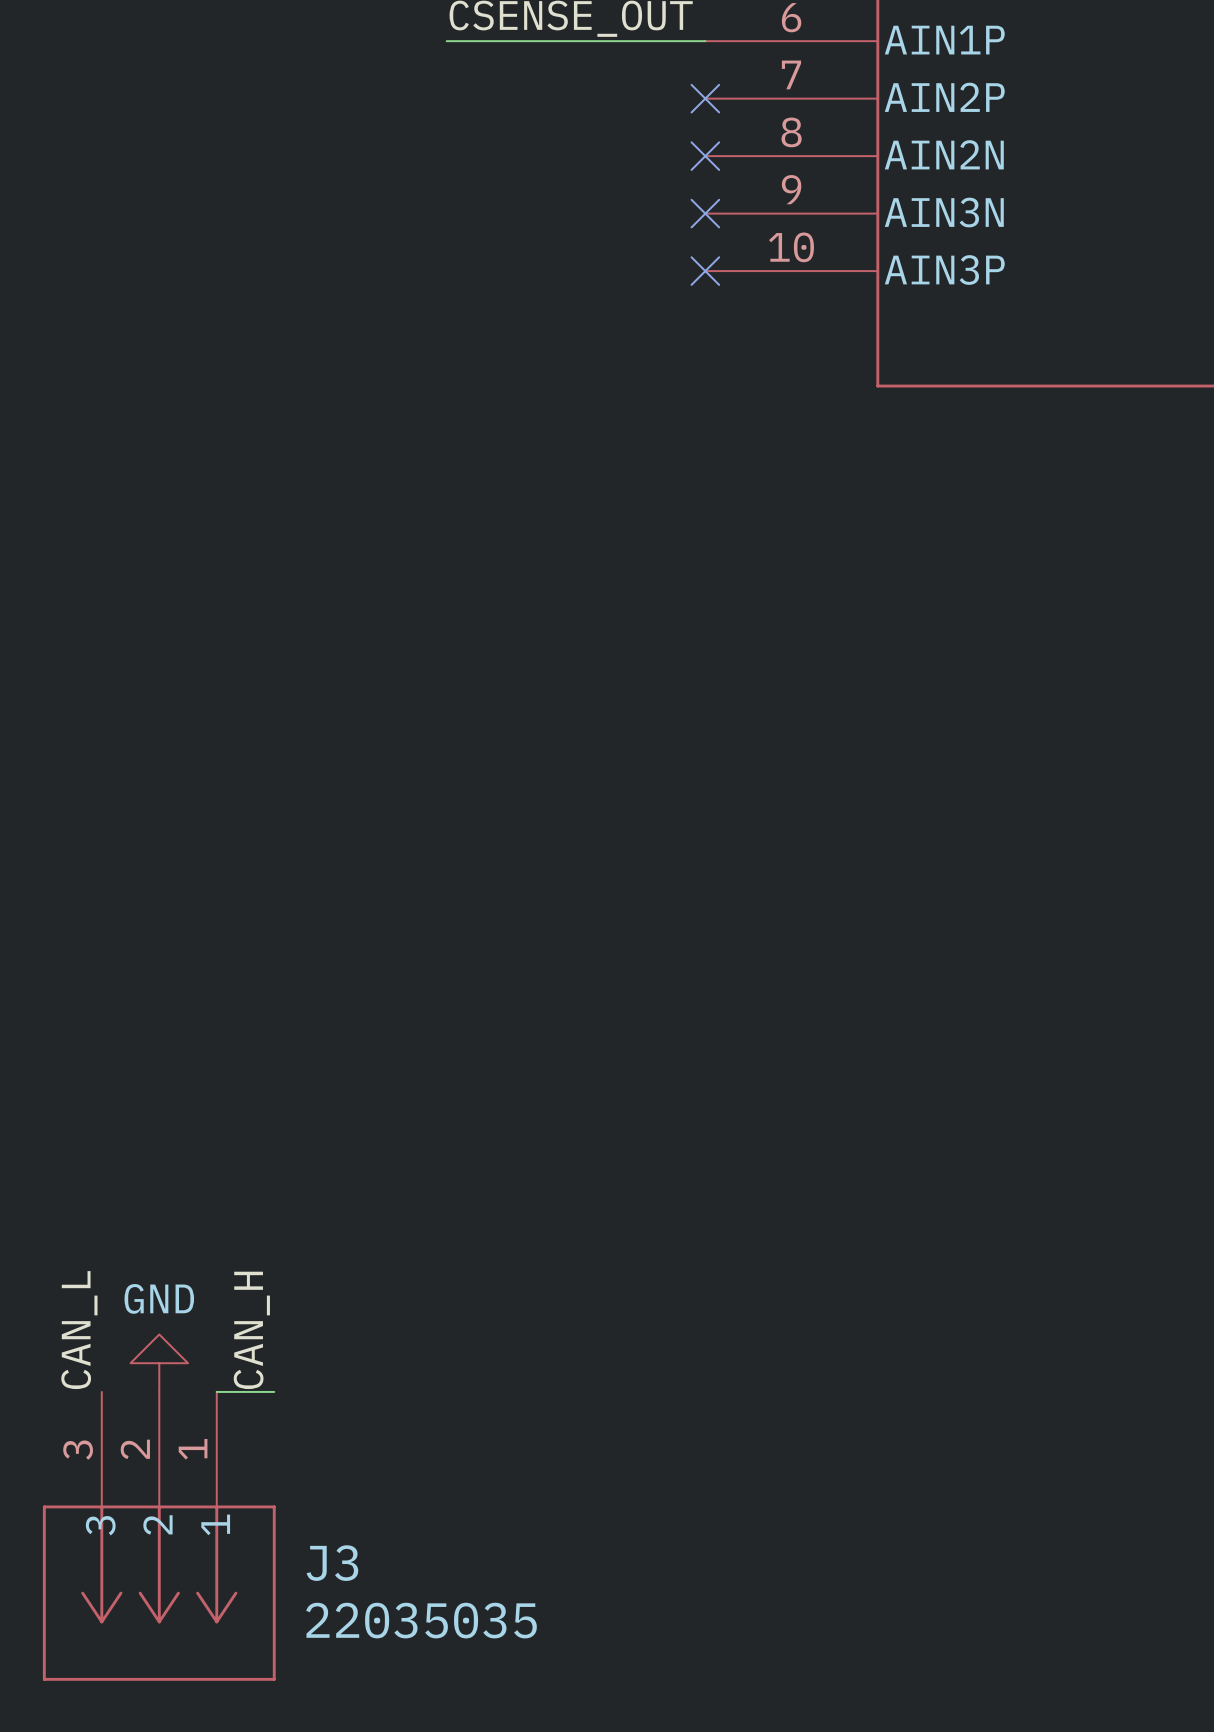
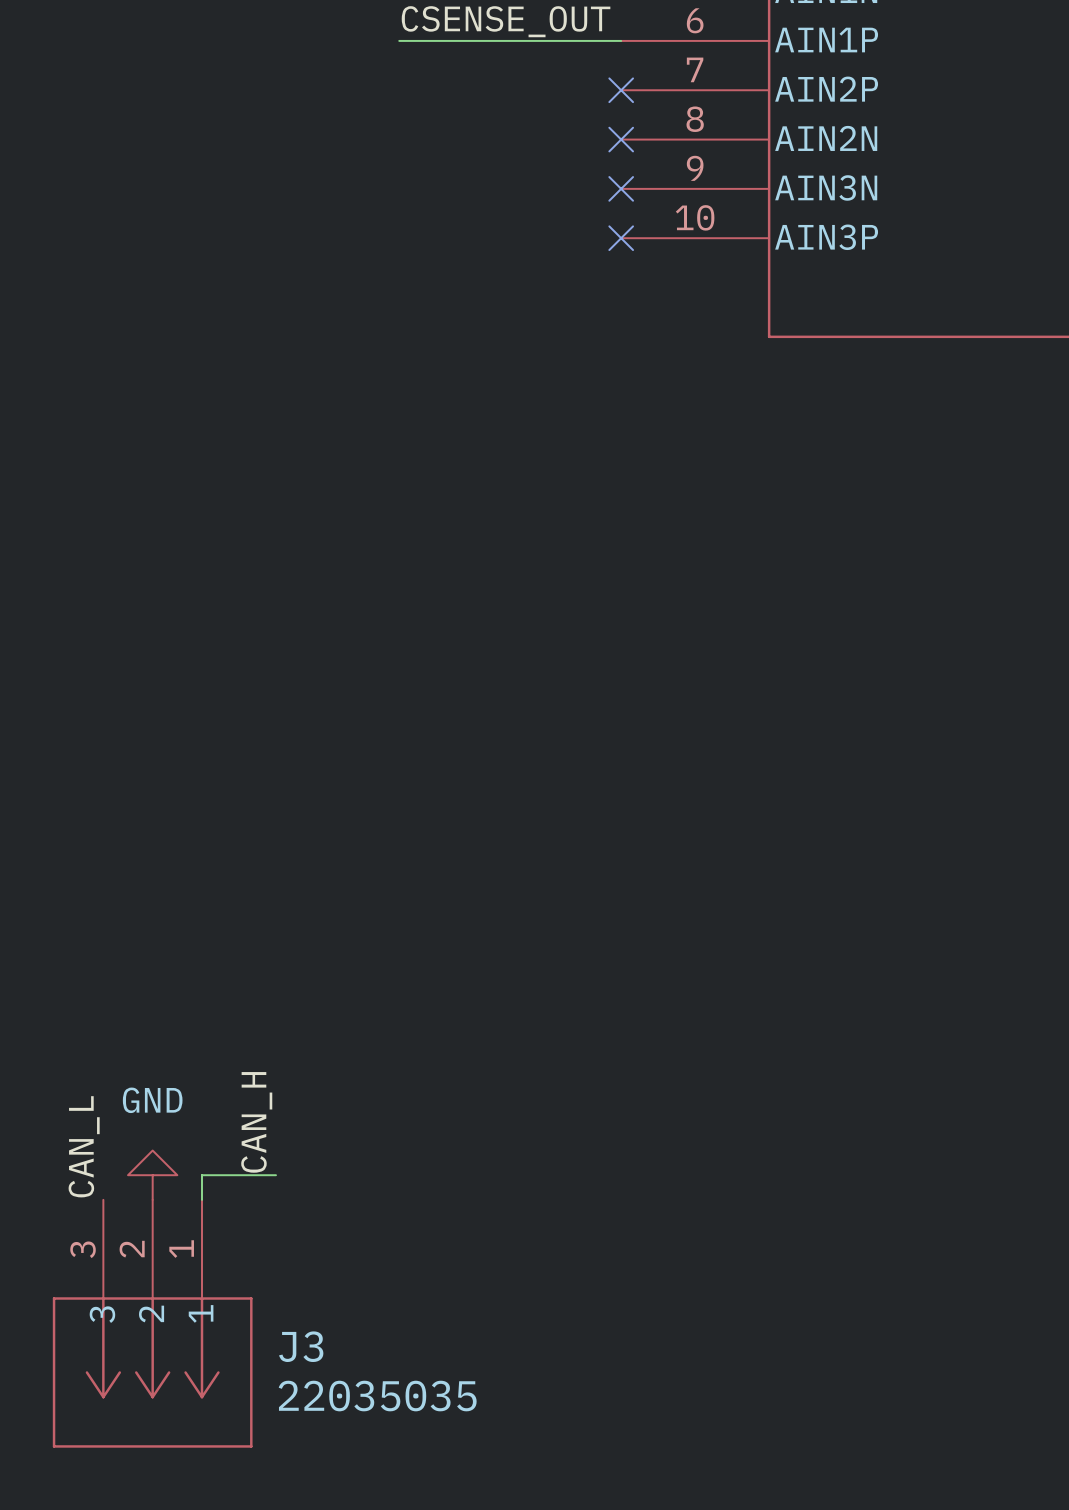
power symbol text position: GND (159, 1298) -> GND (152, 1100)
label position: CAN_H (251, 1330) -> CAN_H (256, 1122)
wire: (216, 1391) (274, 1391) -> (201, 1199) (201, 1175) (275, 1175)

